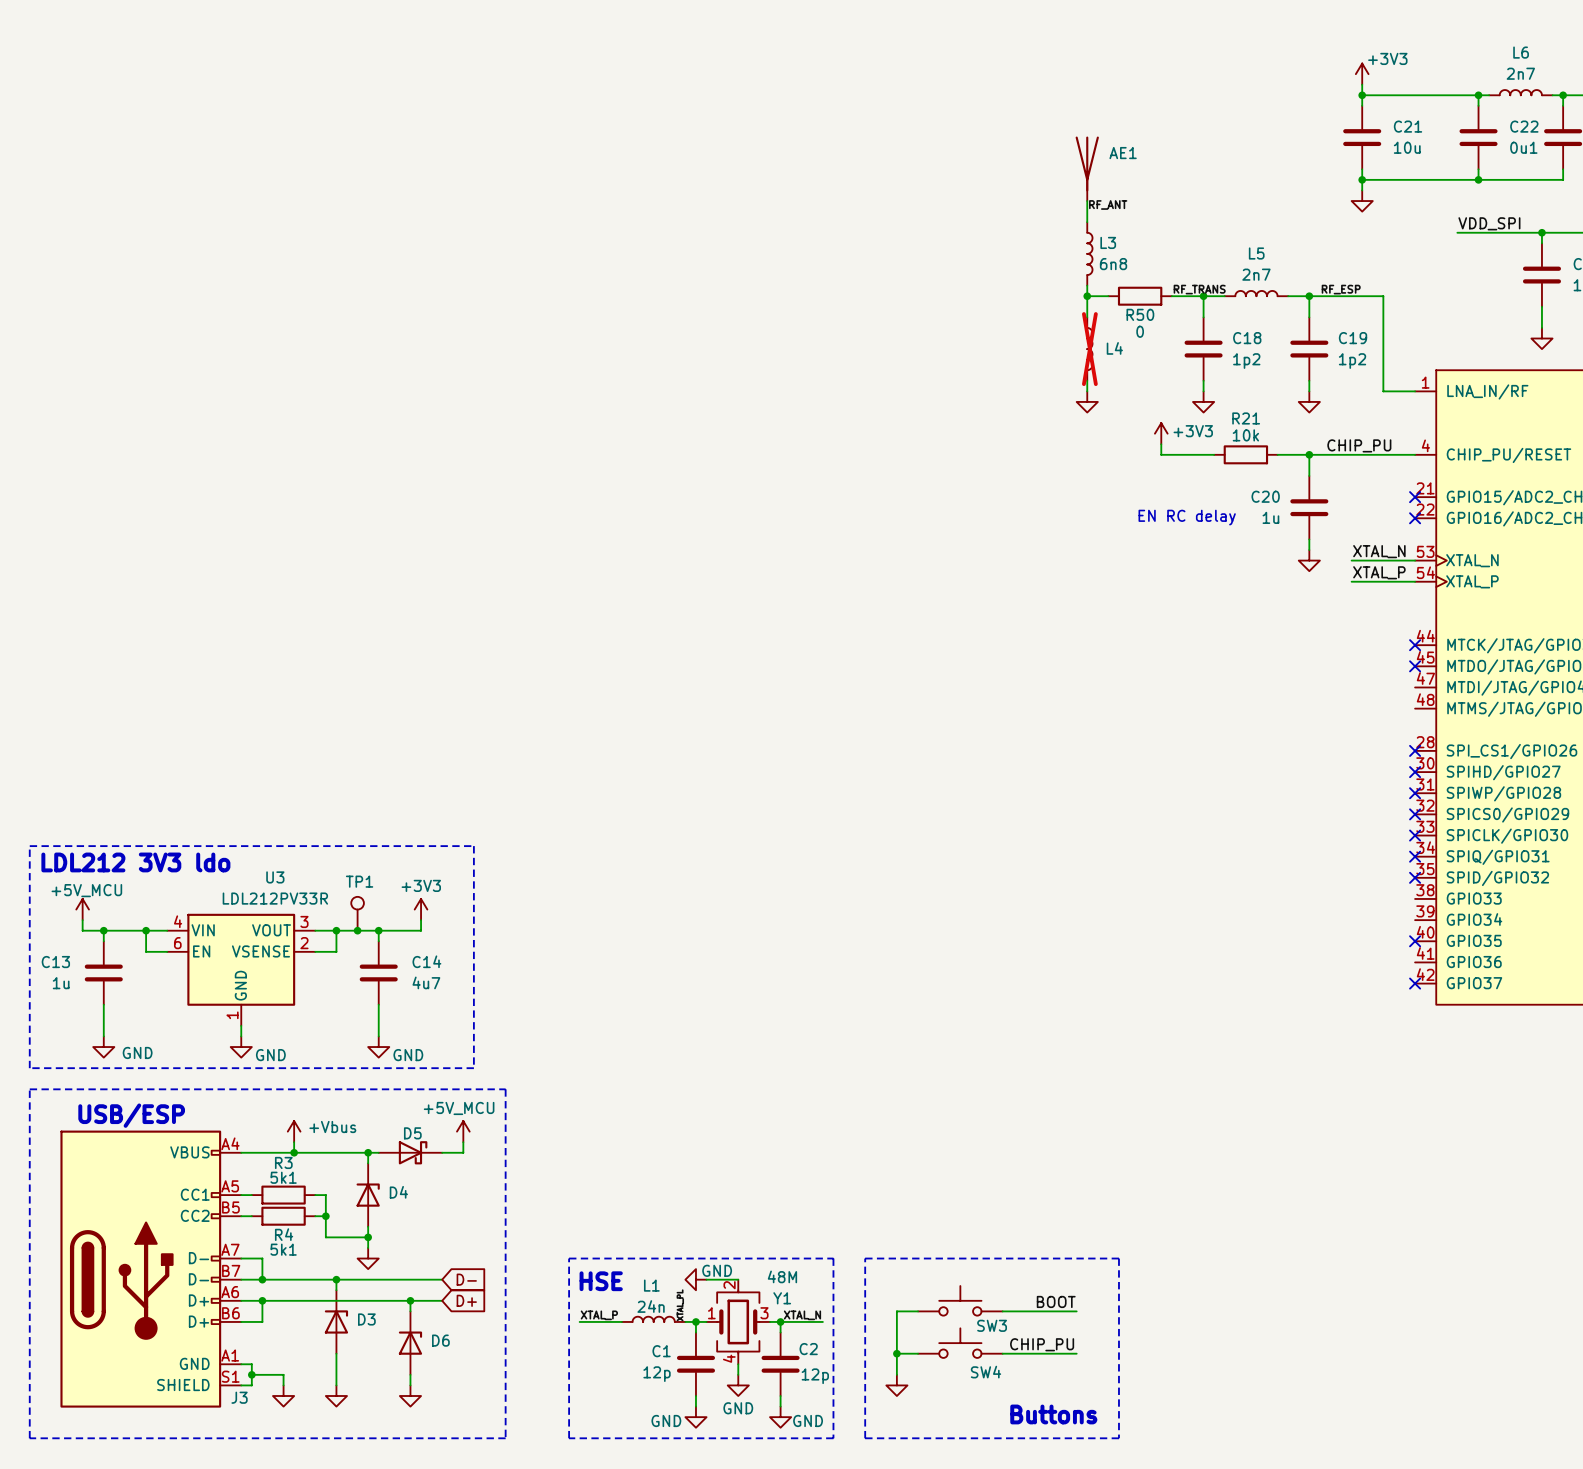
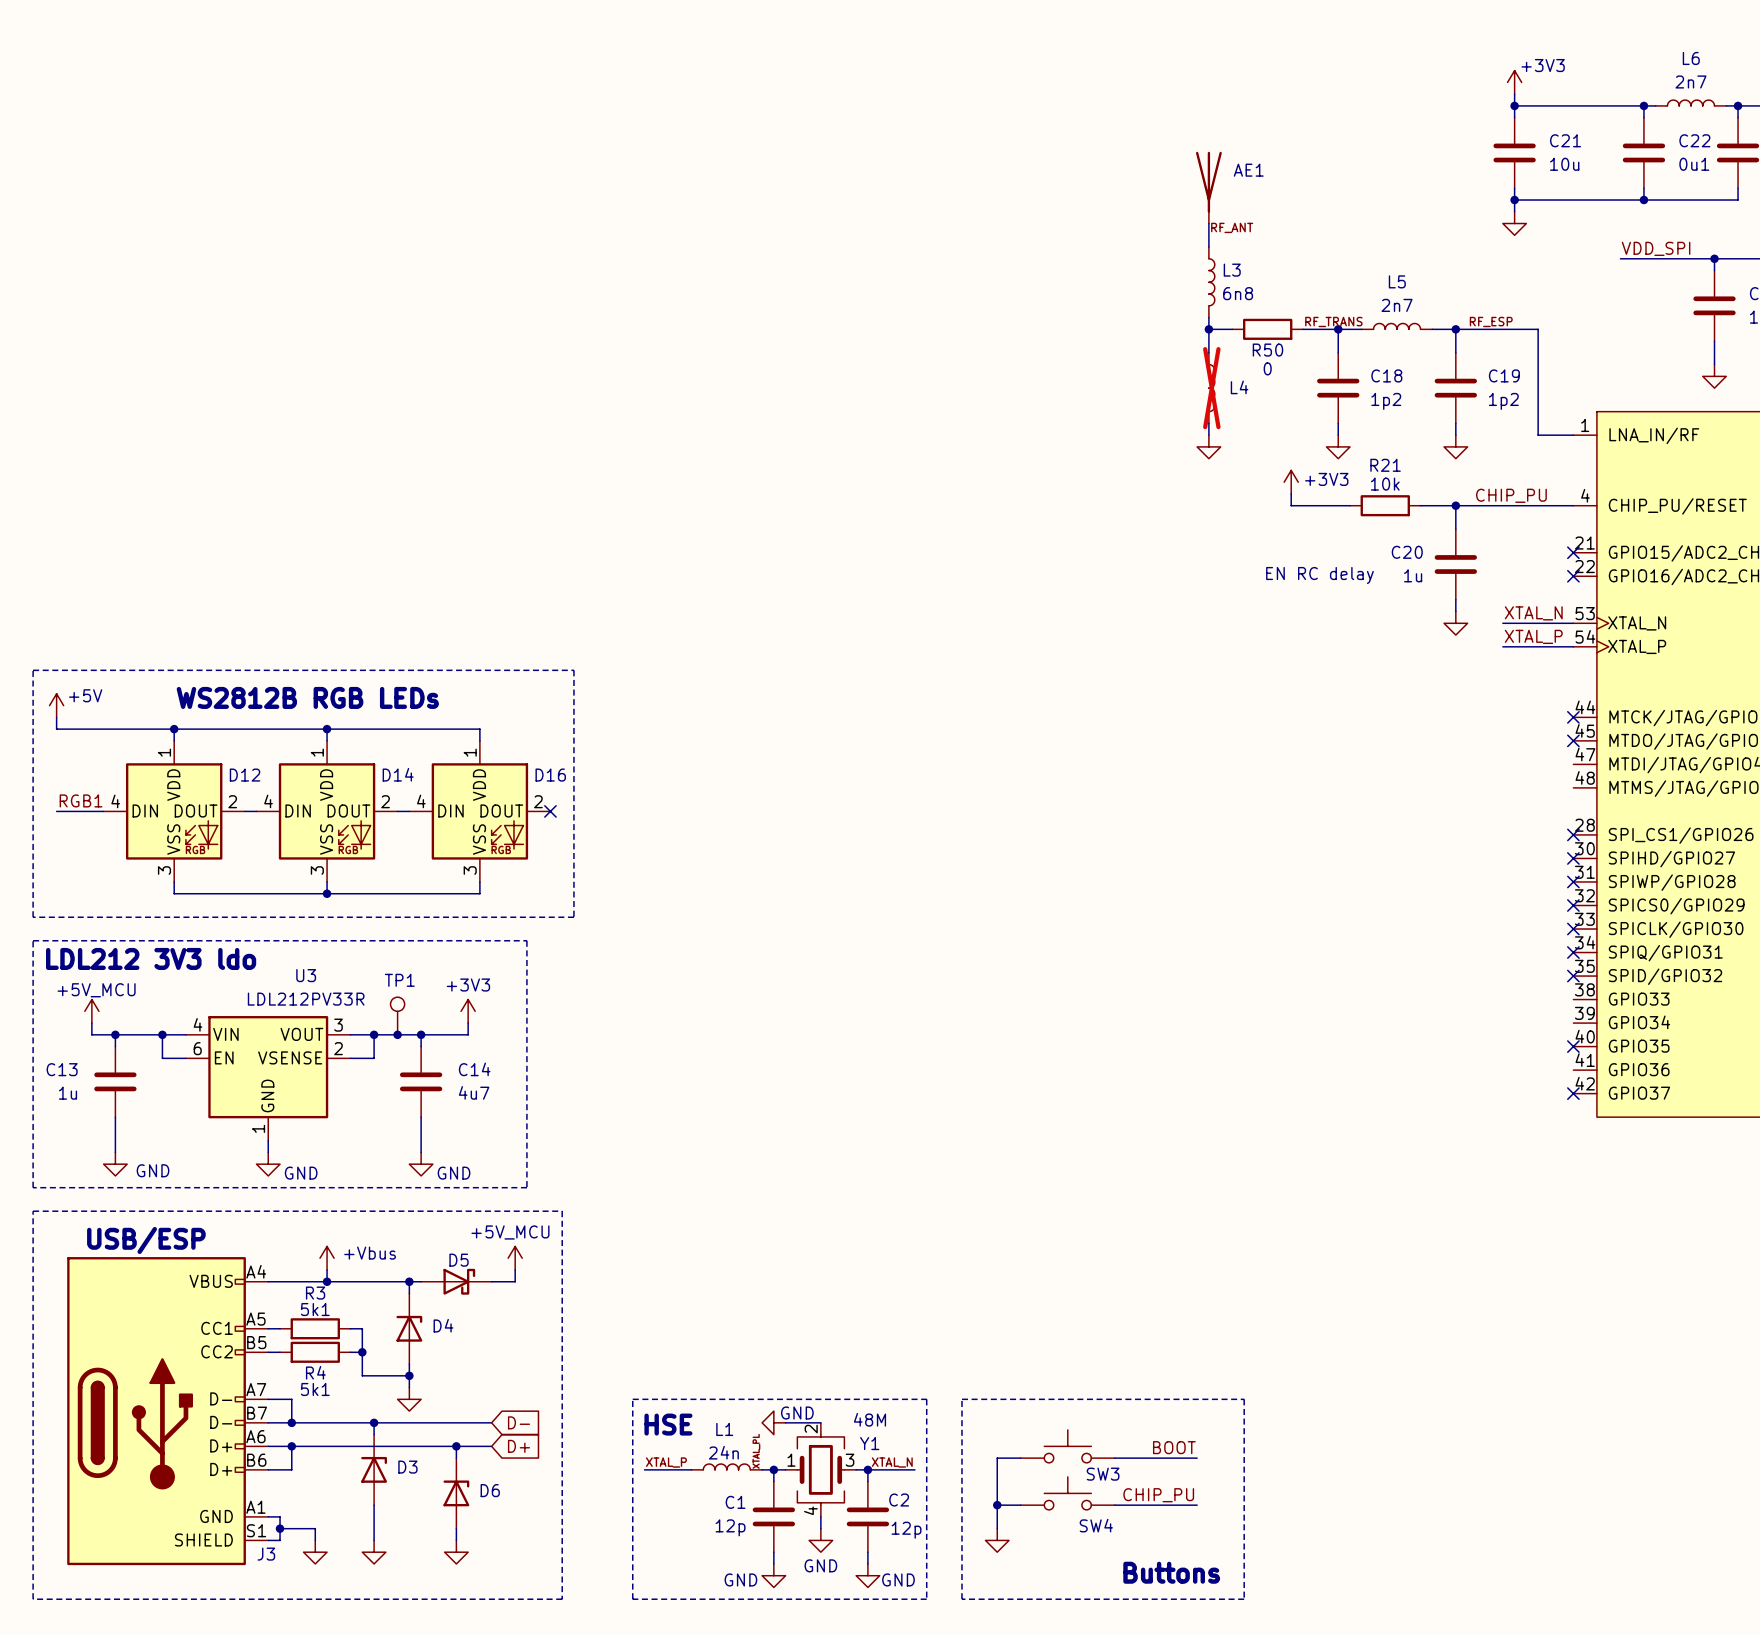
line: none -> (33, 670) (573, 670) (573, 917) (33, 917) (33, 670)
text: none -> WS2812B RGB LEDs (307, 697)
power symbol: none -> +5V (56, 705)
wire: none -> (56, 717) (56, 729) (479, 729) (479, 740)
wire: none -> (174, 729) (174, 740)
junction: none -> (174, 729)
wire: none -> (327, 729) (327, 740)
junction: none -> (327, 729)
label: none -> RGB1 (81, 800)
wire: none -> (56, 811) (103, 811)
D12: none -> (174, 811)
wire: none -> (244, 811) (256, 811)
D14: none -> (327, 811)
wire: none -> (397, 811) (409, 811)
D16: none -> (479, 811)
no-connect mark: none -> (550, 811)
wire: none -> (174, 881) (174, 893) (479, 893) (479, 881)
wire: none -> (327, 881) (327, 893)
junction: none -> (327, 893)

